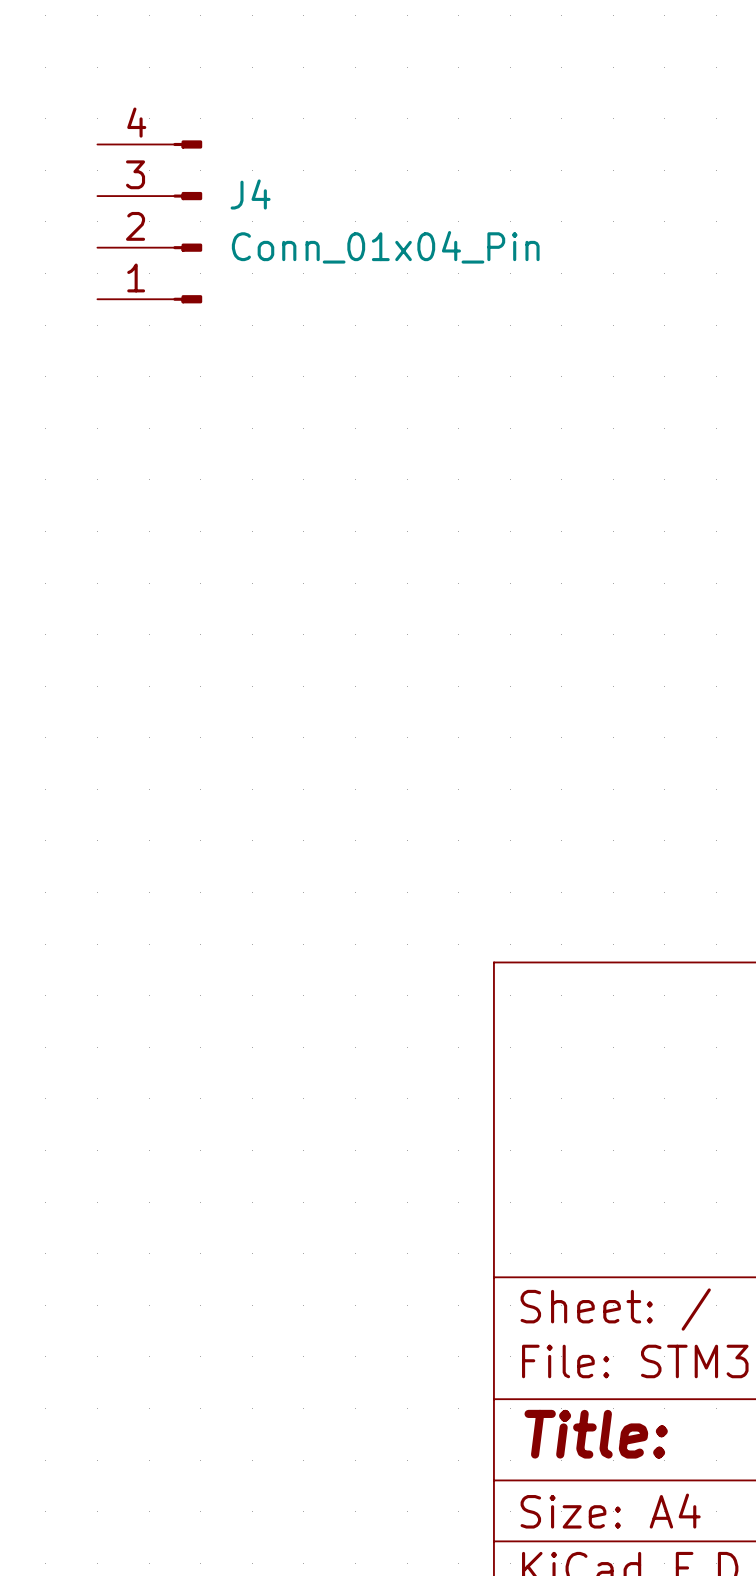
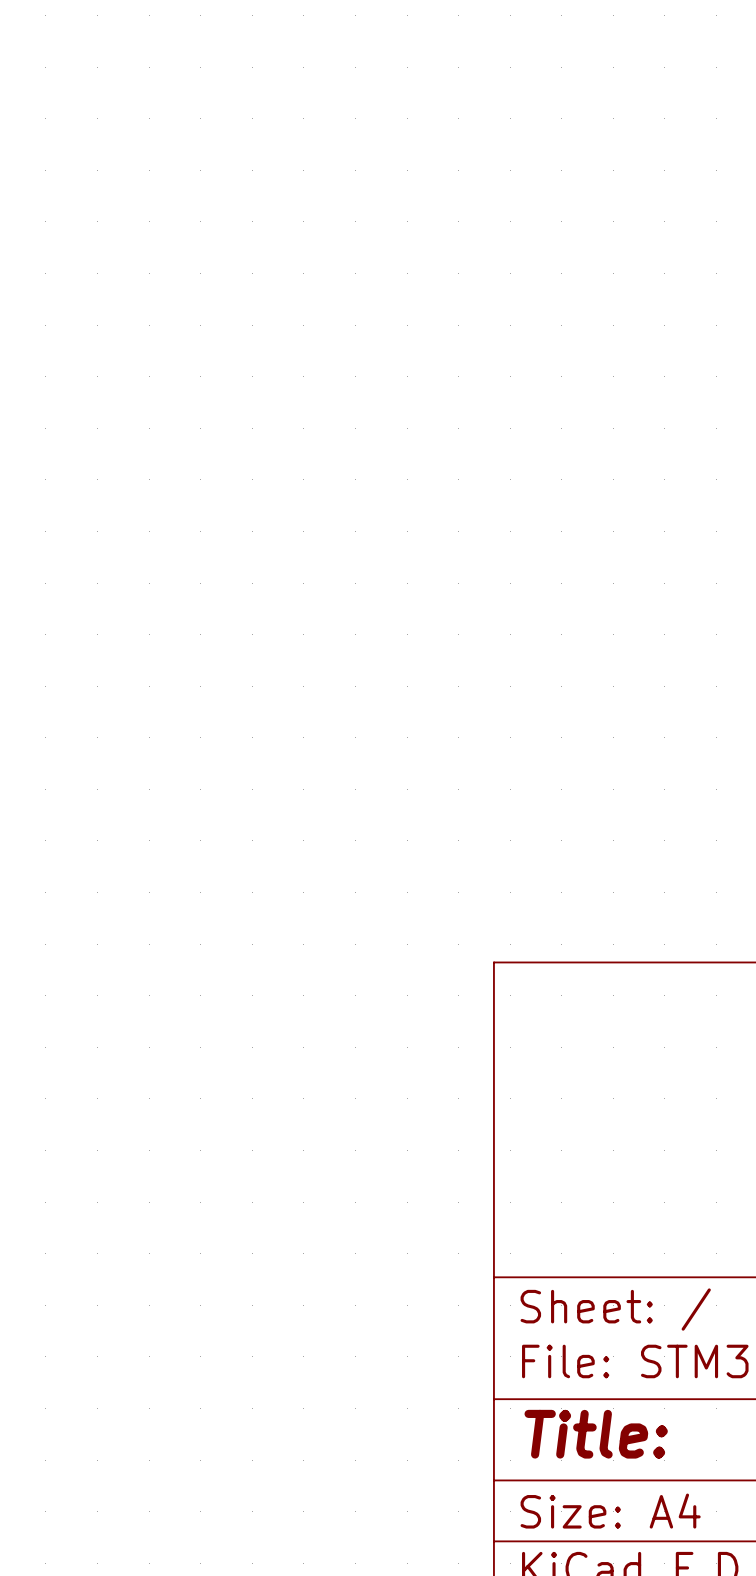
J4: Conn_01x04_Pin (149, 221) -> none

